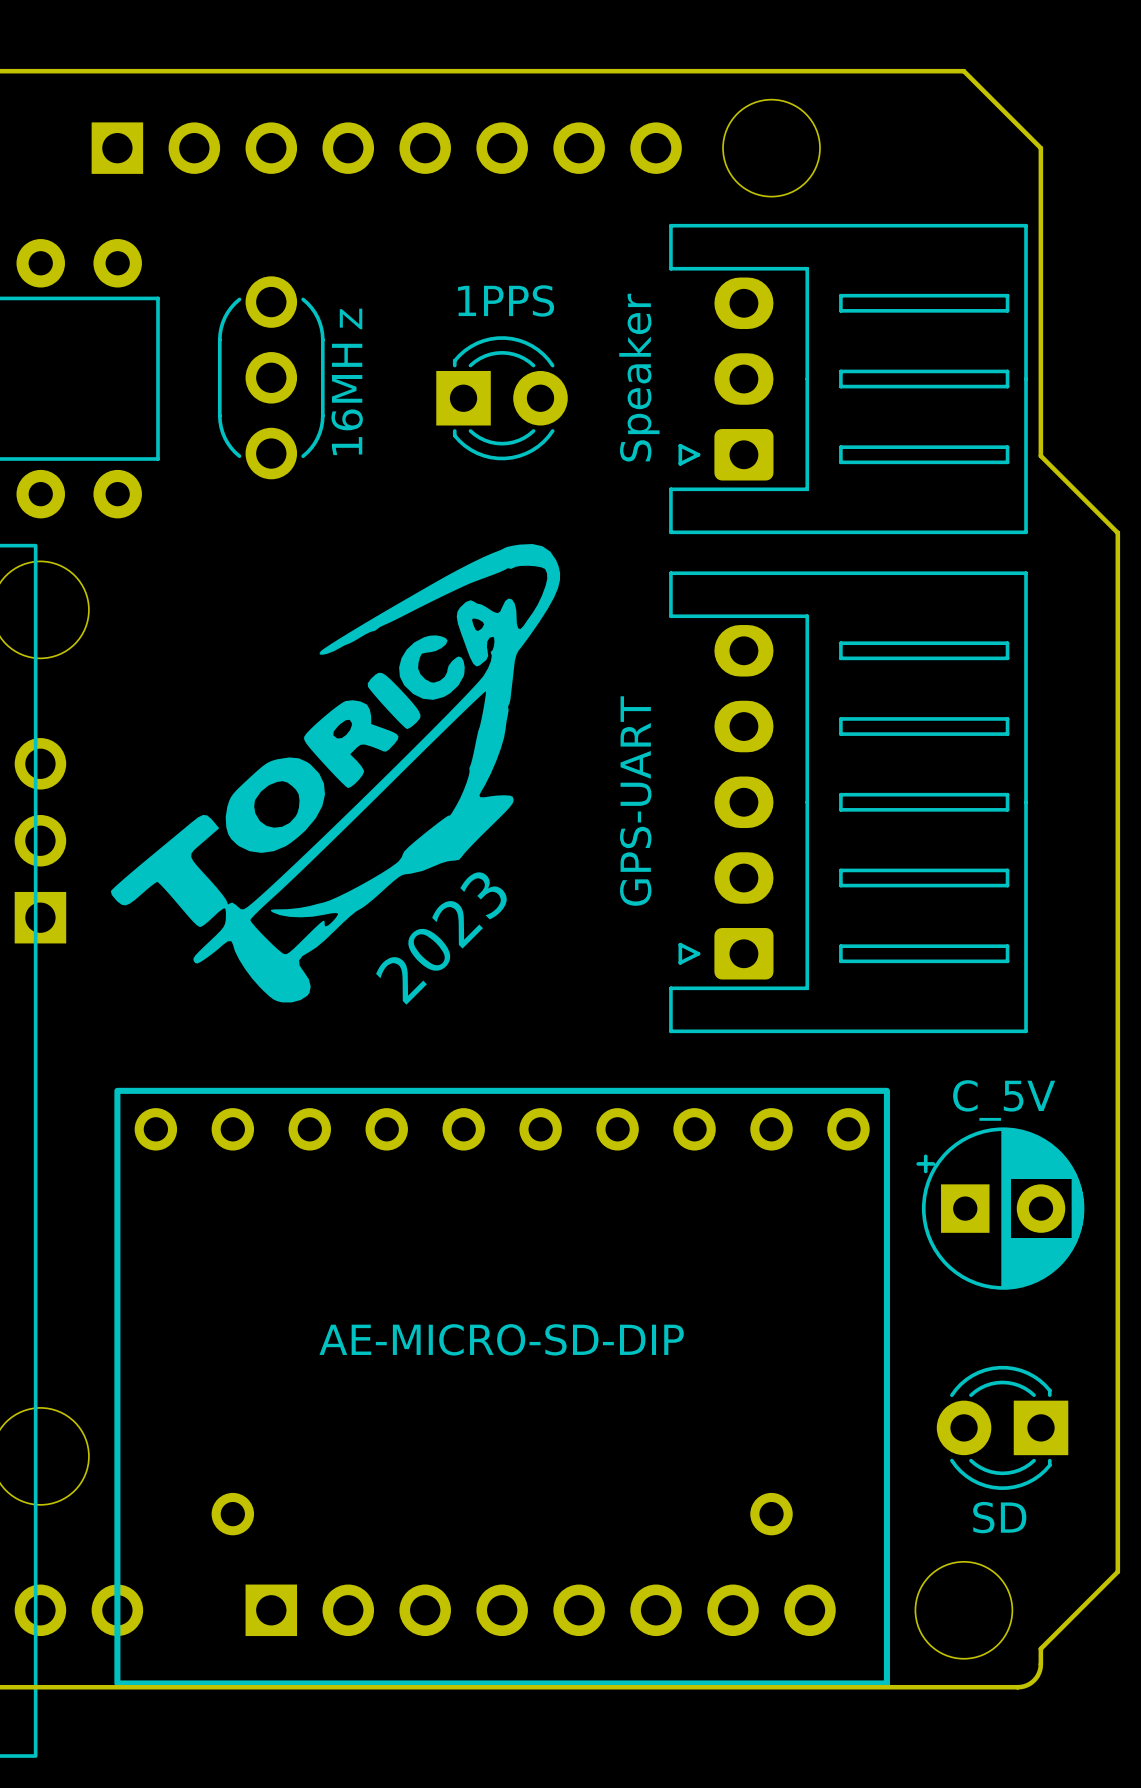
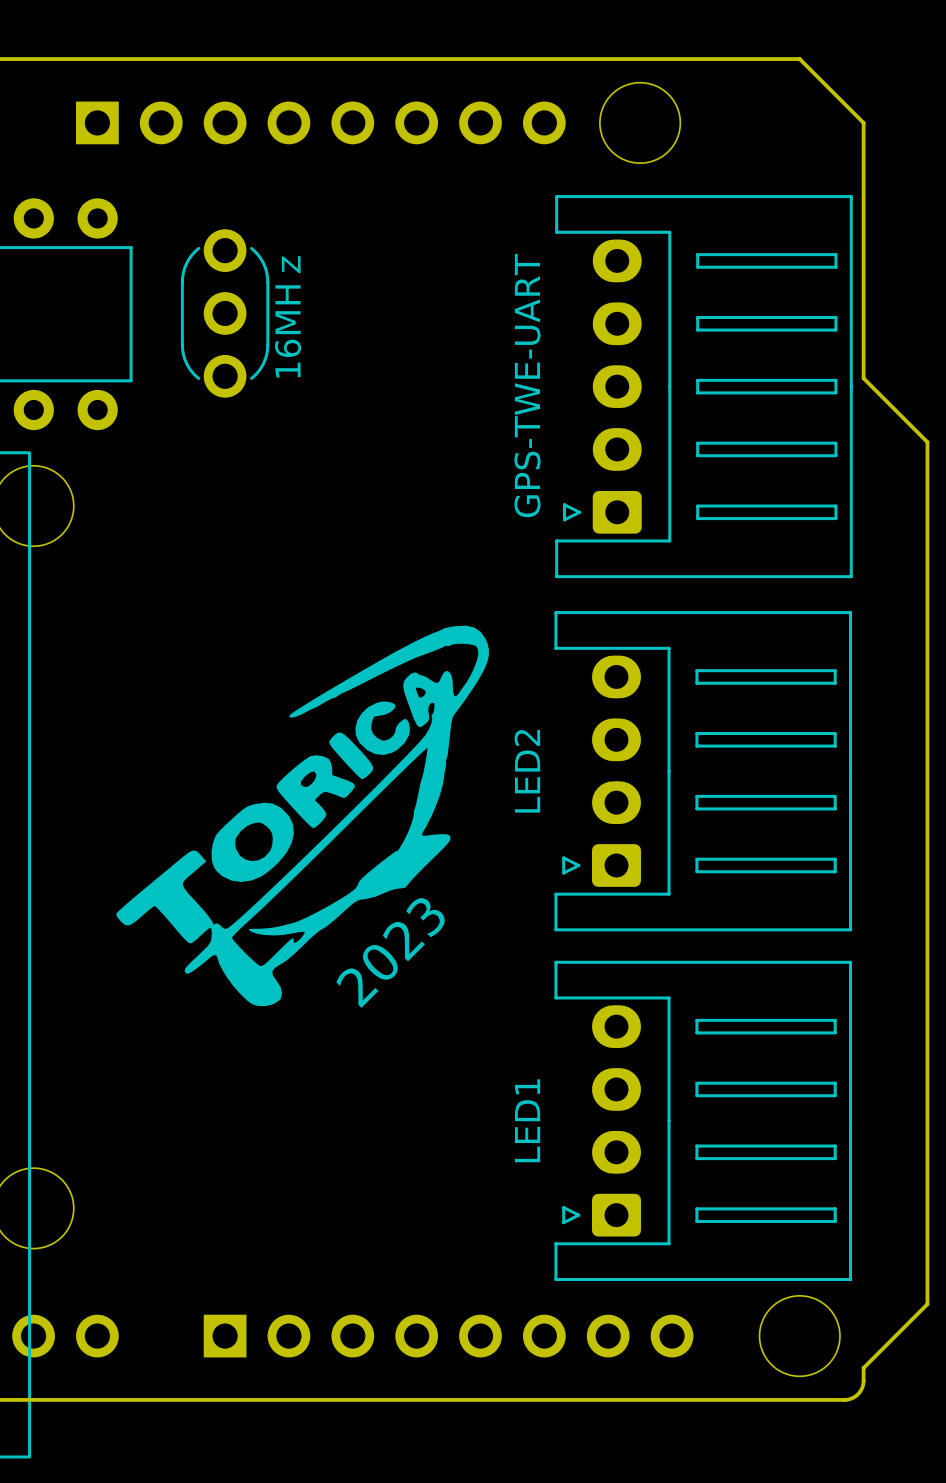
part: Speaker (848, 379) -> none
part: 1PPS (502, 398) -> none
part: none -> GPS-TWE-UART (703, 386)
drawing position: (335, 773) -> (302, 815)
part: GPS-UART (848, 802) -> none
part: (40, 840) -> none
LED2: none -> (703, 771)
text position: 2023 (441, 938) -> 2023 (390, 952)
part: C_5V (1000, 1208) -> none
LED1: none -> (703, 1120)
part: AE-MICRO-SD-DIP (502, 1387) -> none
part: SD (1002, 1427) -> none

